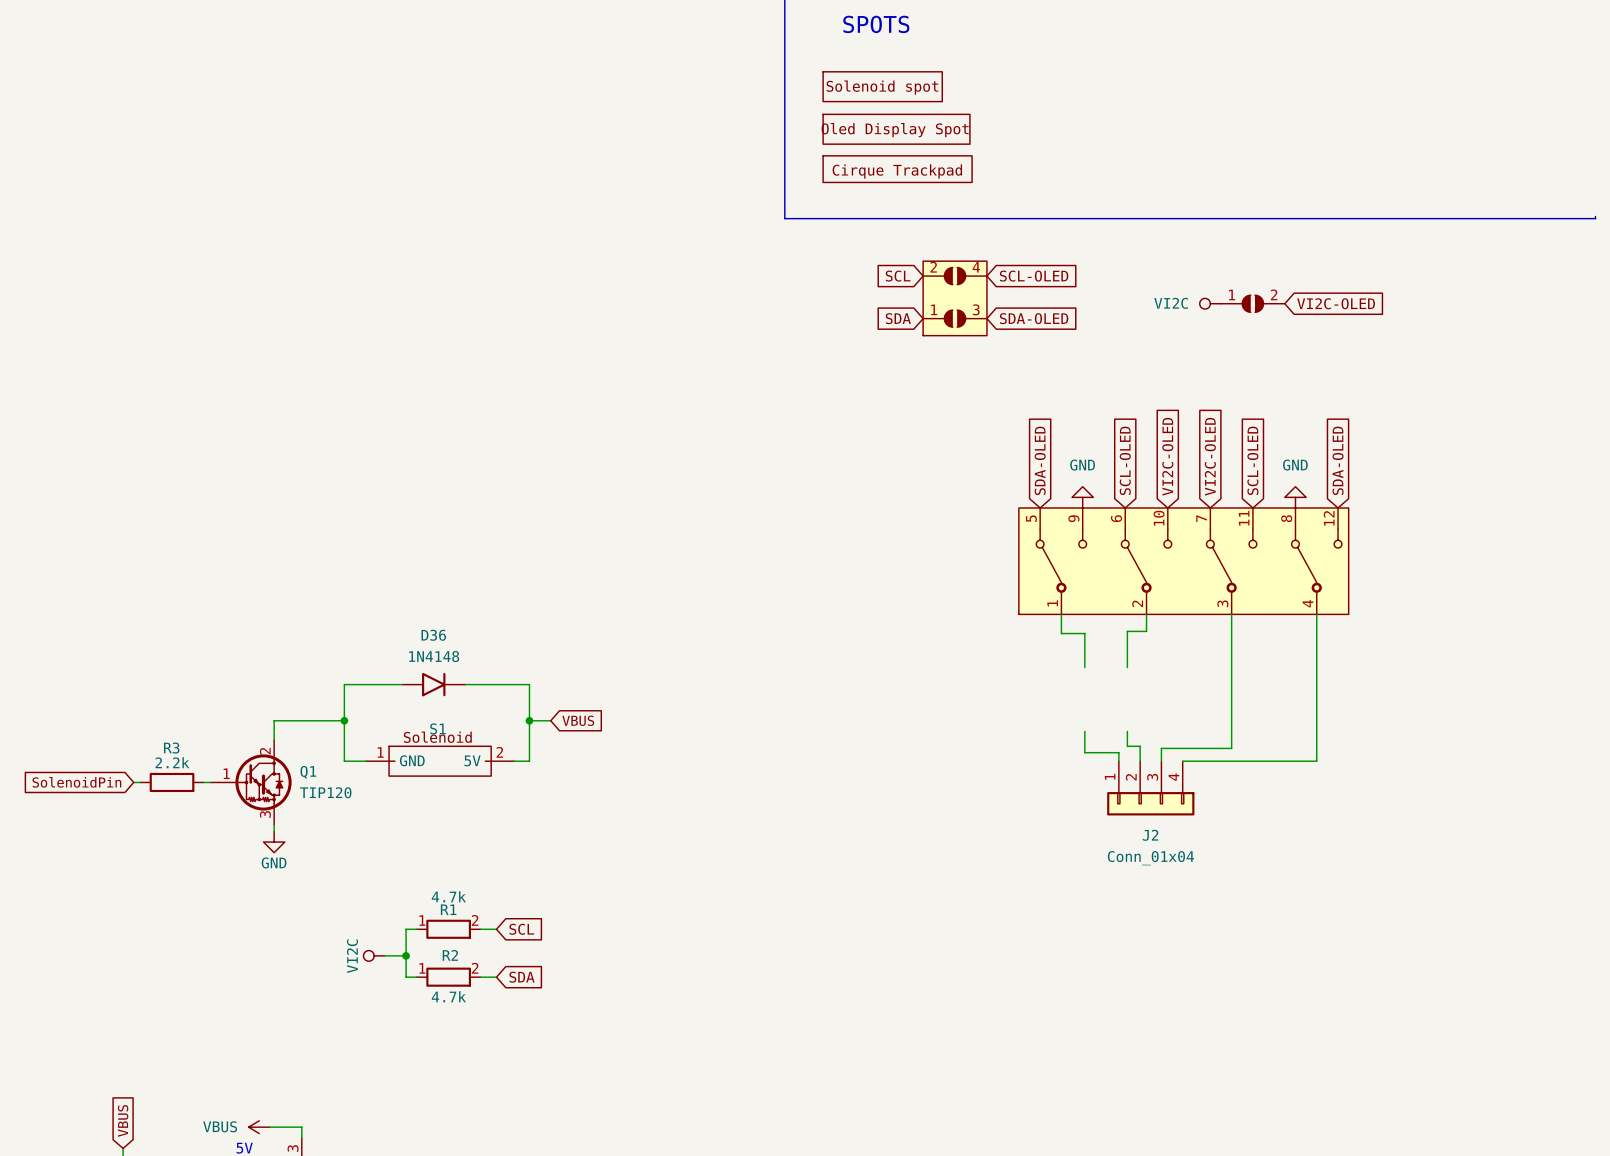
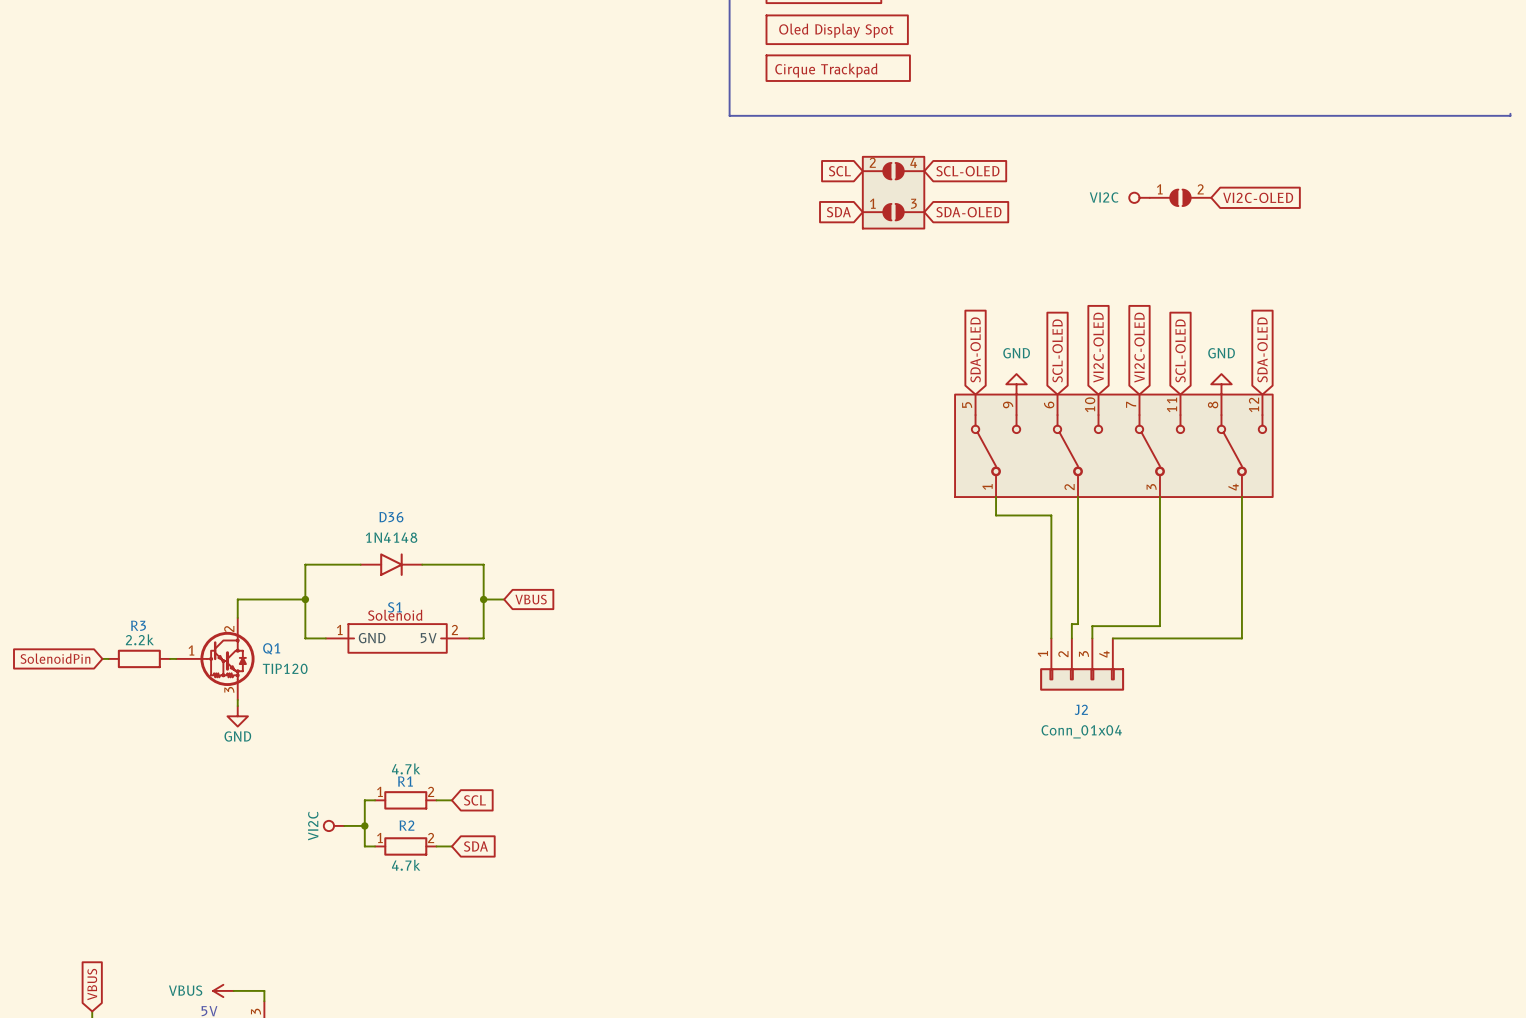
wire: (1146, 631) (1127, 631) (1127, 667) -> (1078, 513) (1078, 624) (1071, 624)
wire: (1084, 633) (1084, 667) -> (1018, 515) (1051, 515) (1051, 630)
wire: (1084, 731) (1084, 752) (1118, 752) -> none
wire: (1127, 731) (1127, 746) (1140, 746) -> none

